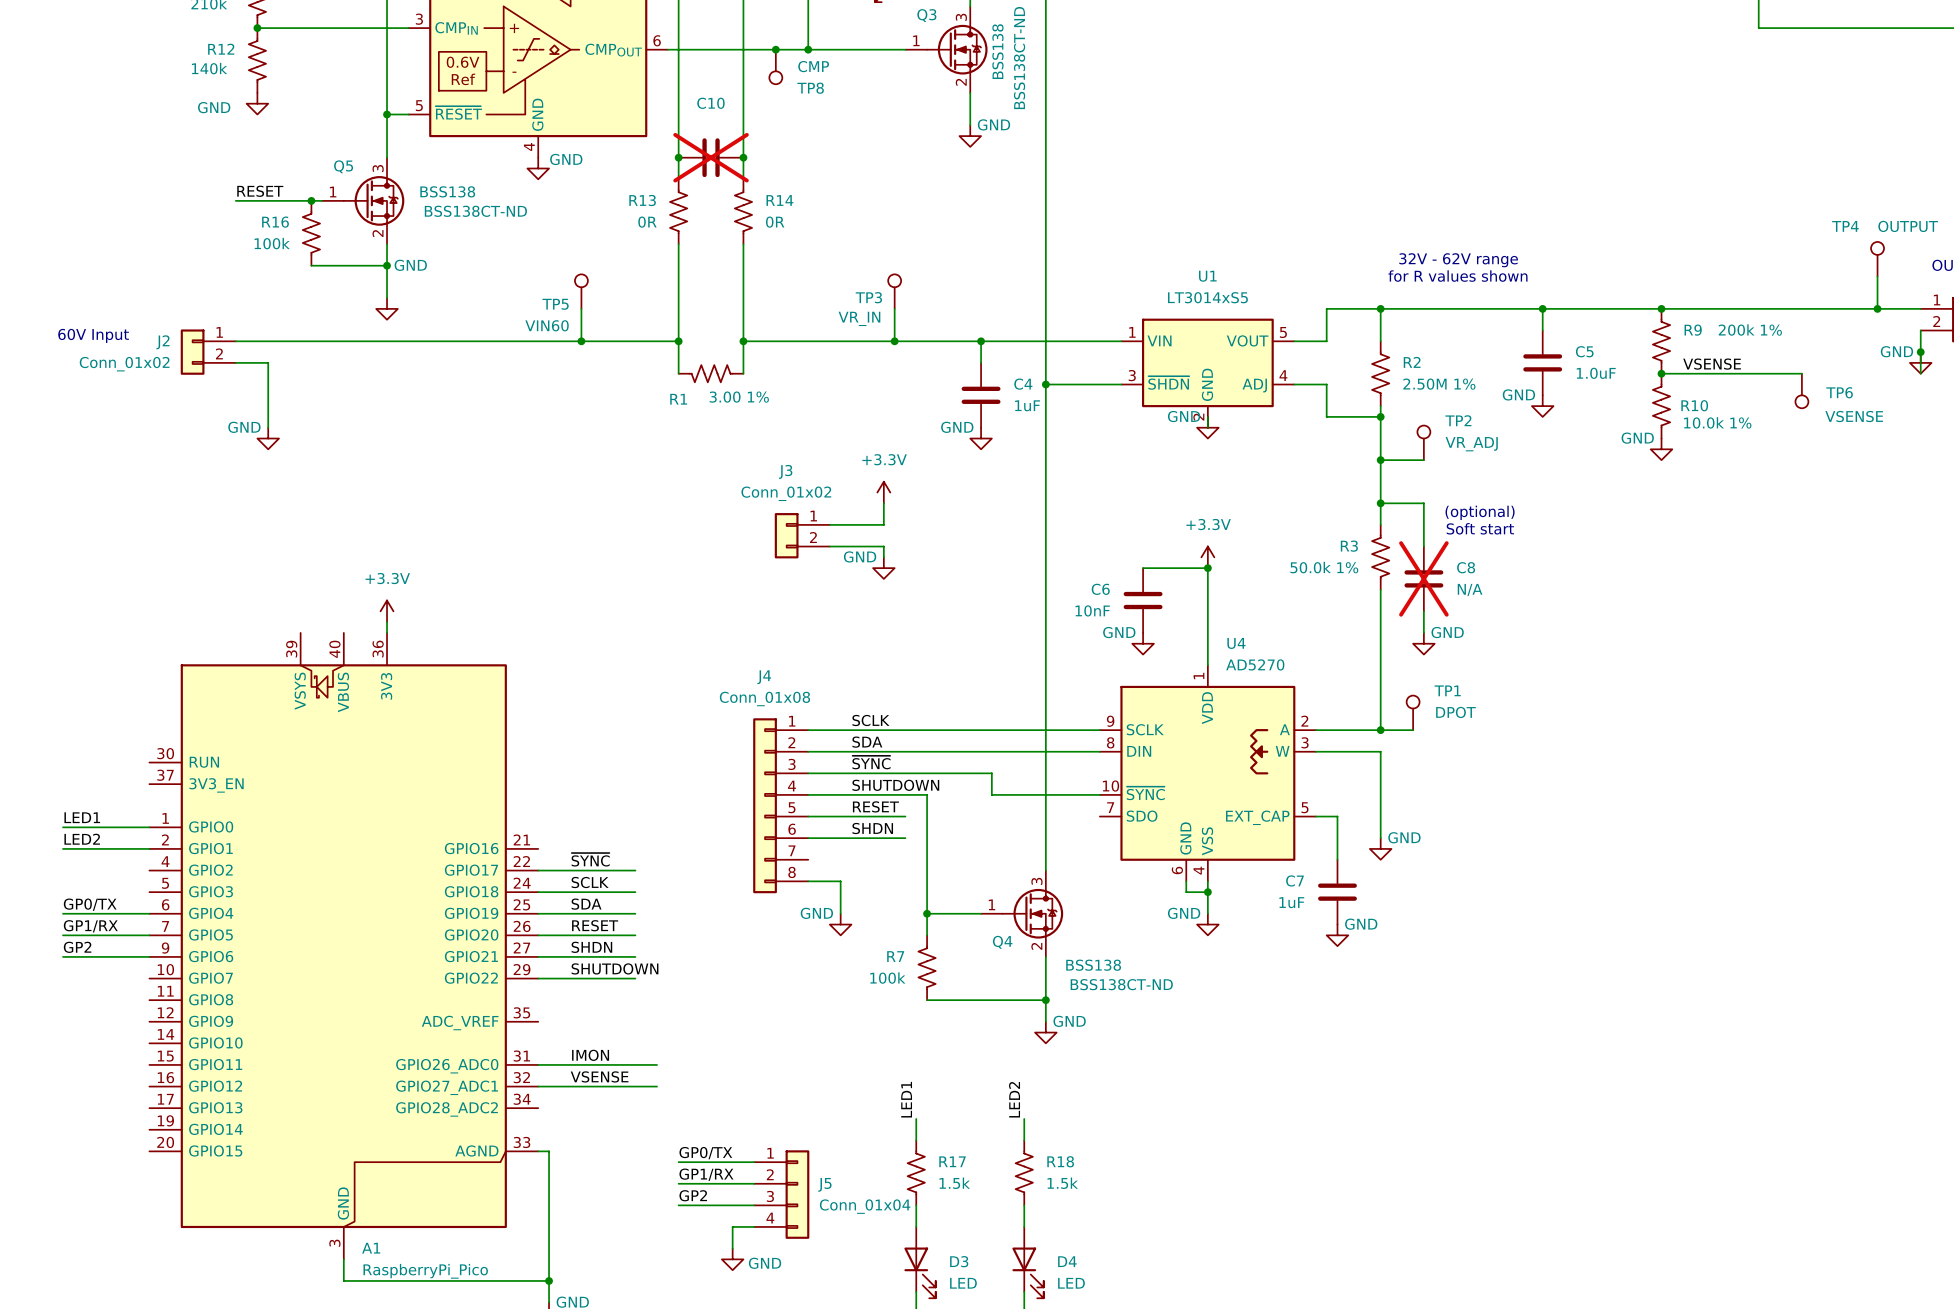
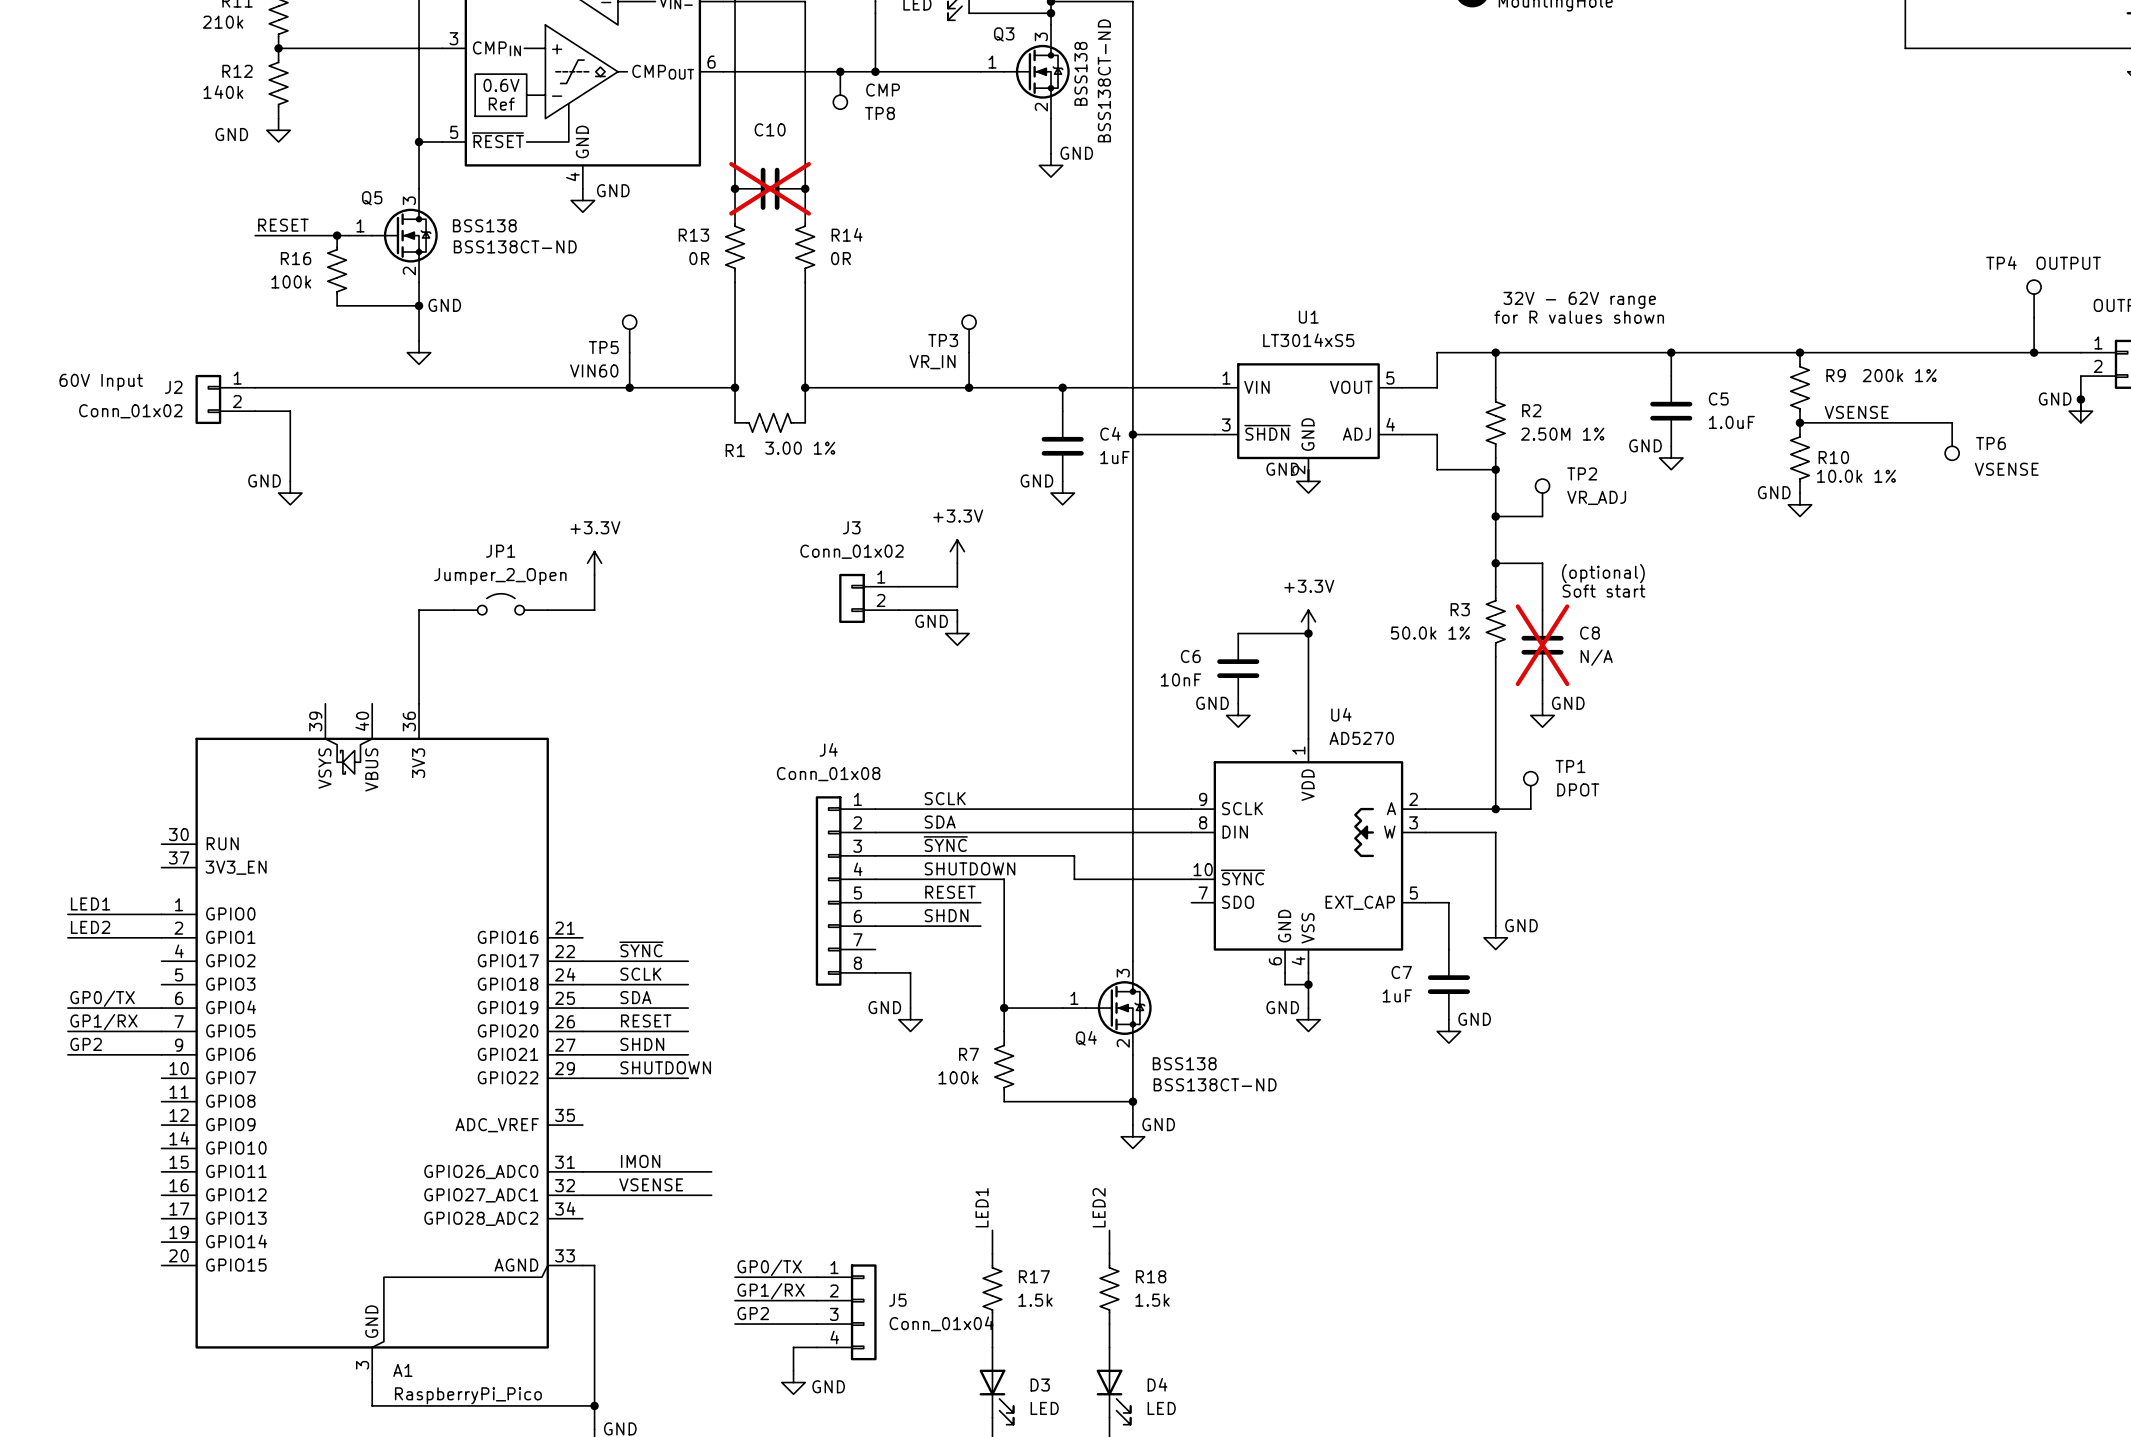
wire: none -> (594, 575) (594, 610) (547, 610)
JP1: none -> Jumper_2_Open (500, 604)
wire: none -> (454, 610) (419, 610) (419, 692)
power symbol position: +3.3V (387, 611) -> +3.3V (594, 563)

